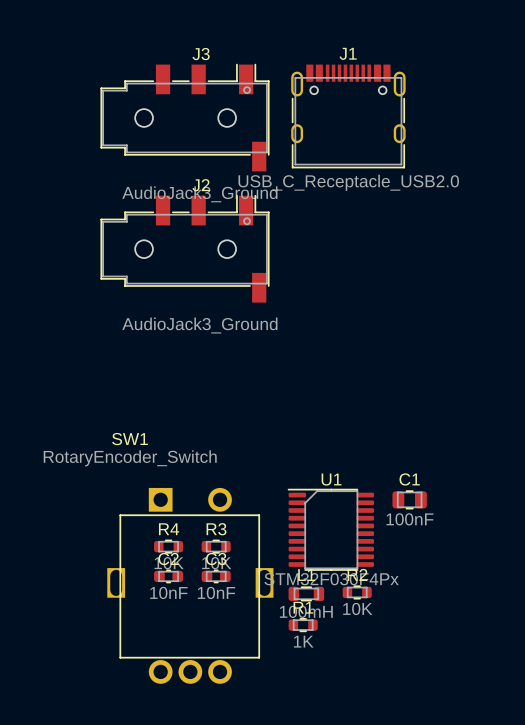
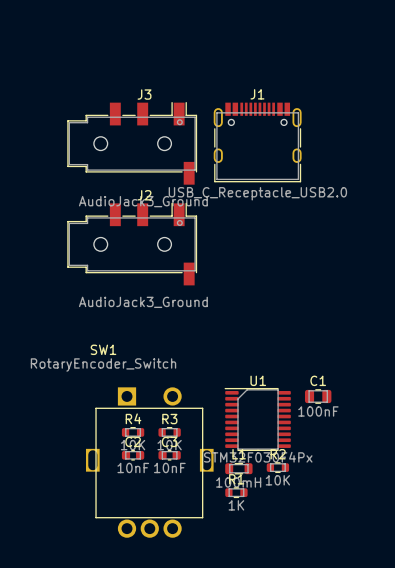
J1 position: (348, 116) -> (257, 142)
J3 position: (185, 117) -> (132, 143)
J2 position: (185, 248) -> (132, 244)

